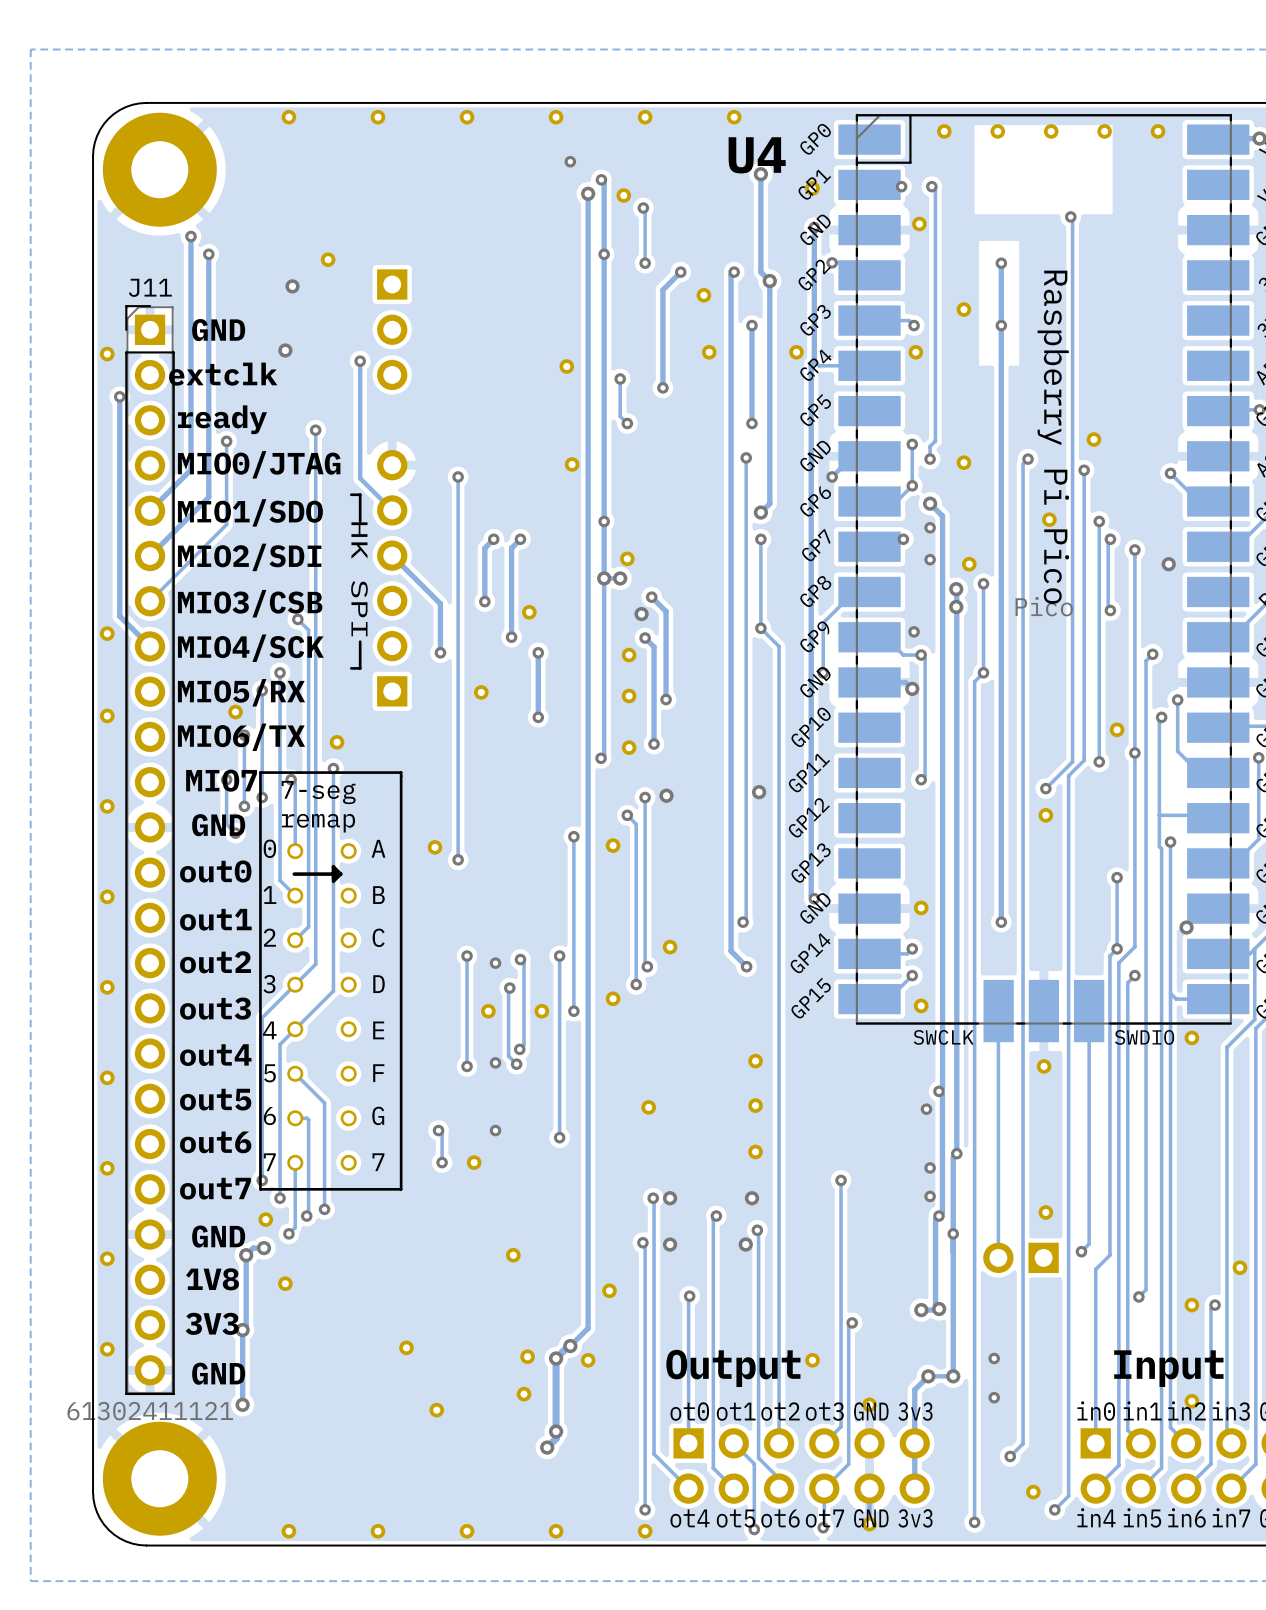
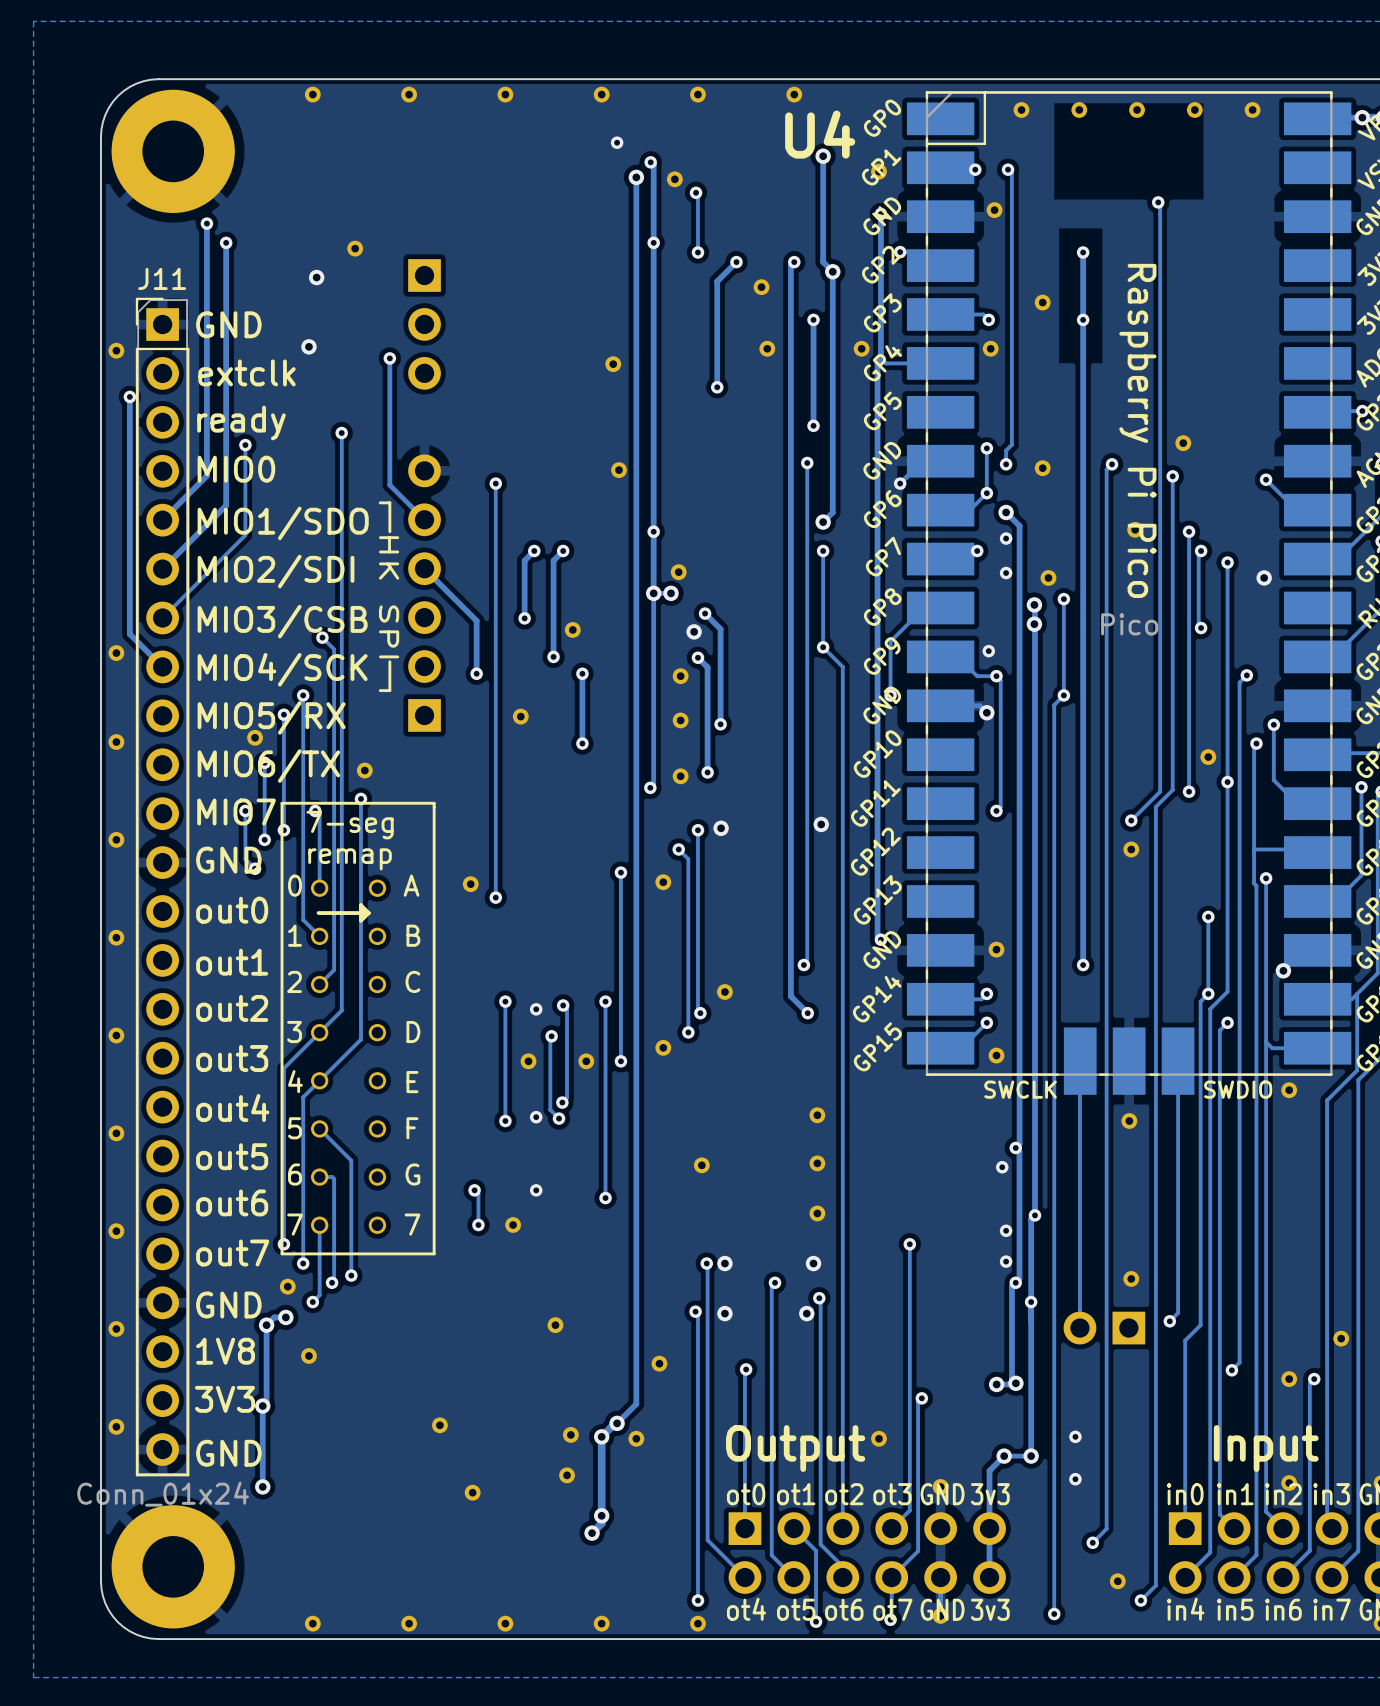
track: (620, 378) (620, 416) (627, 423) -> none
via: (620, 378) -> none
via: (627, 423) -> none
text: MIO0/JTAG (259, 464) -> MIO0 (236, 469)
J11 value: 61302411121 (150, 1411) -> Conn_01x24 (163, 1494)

